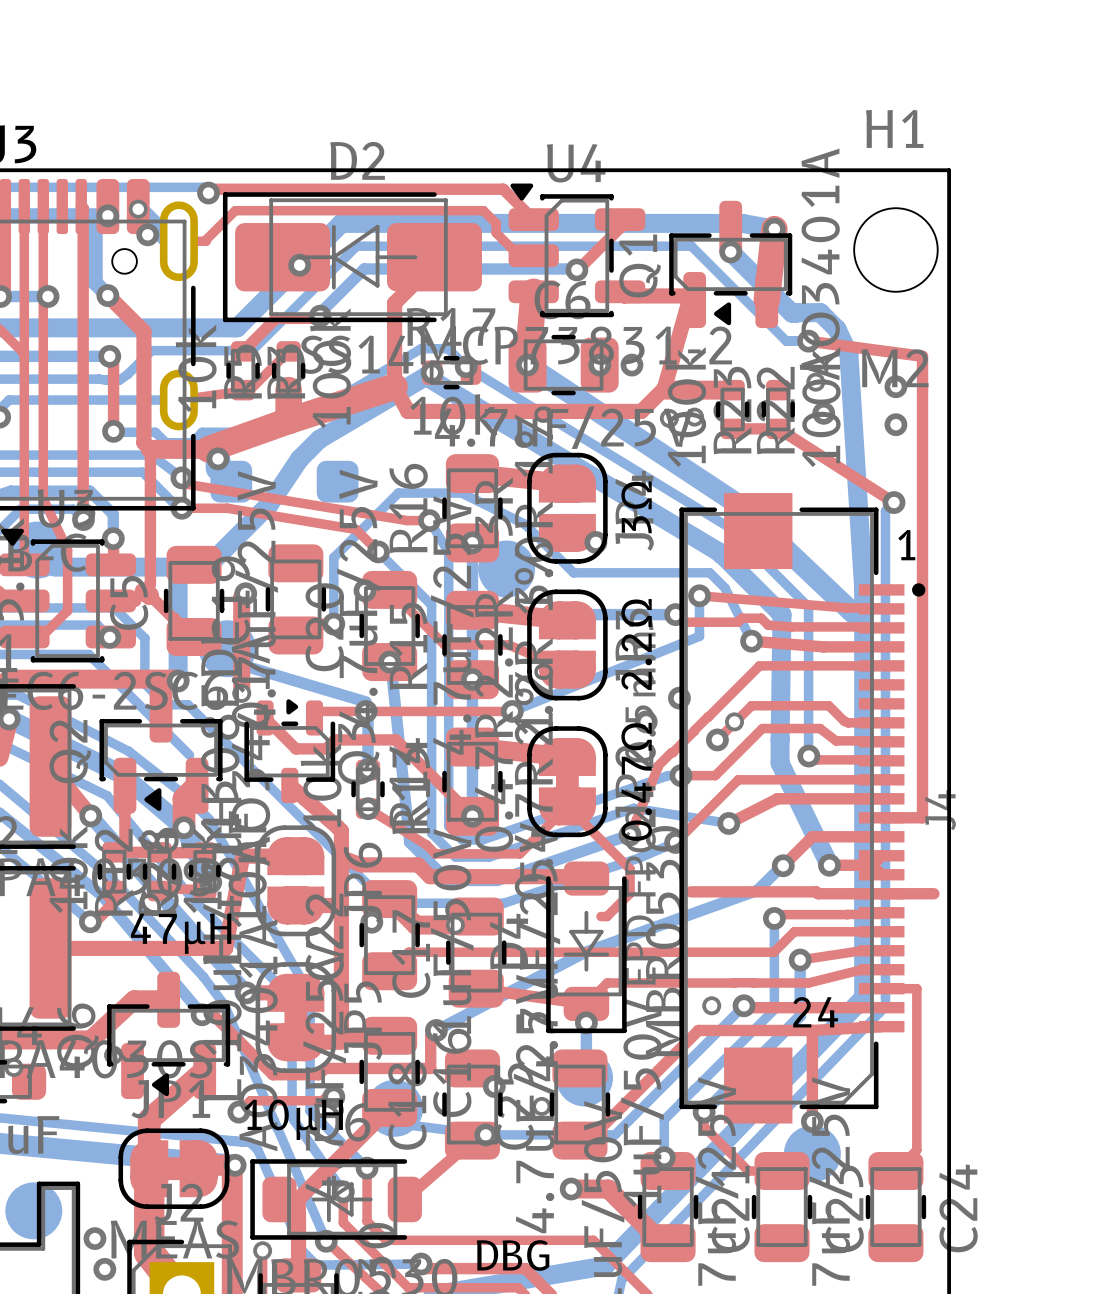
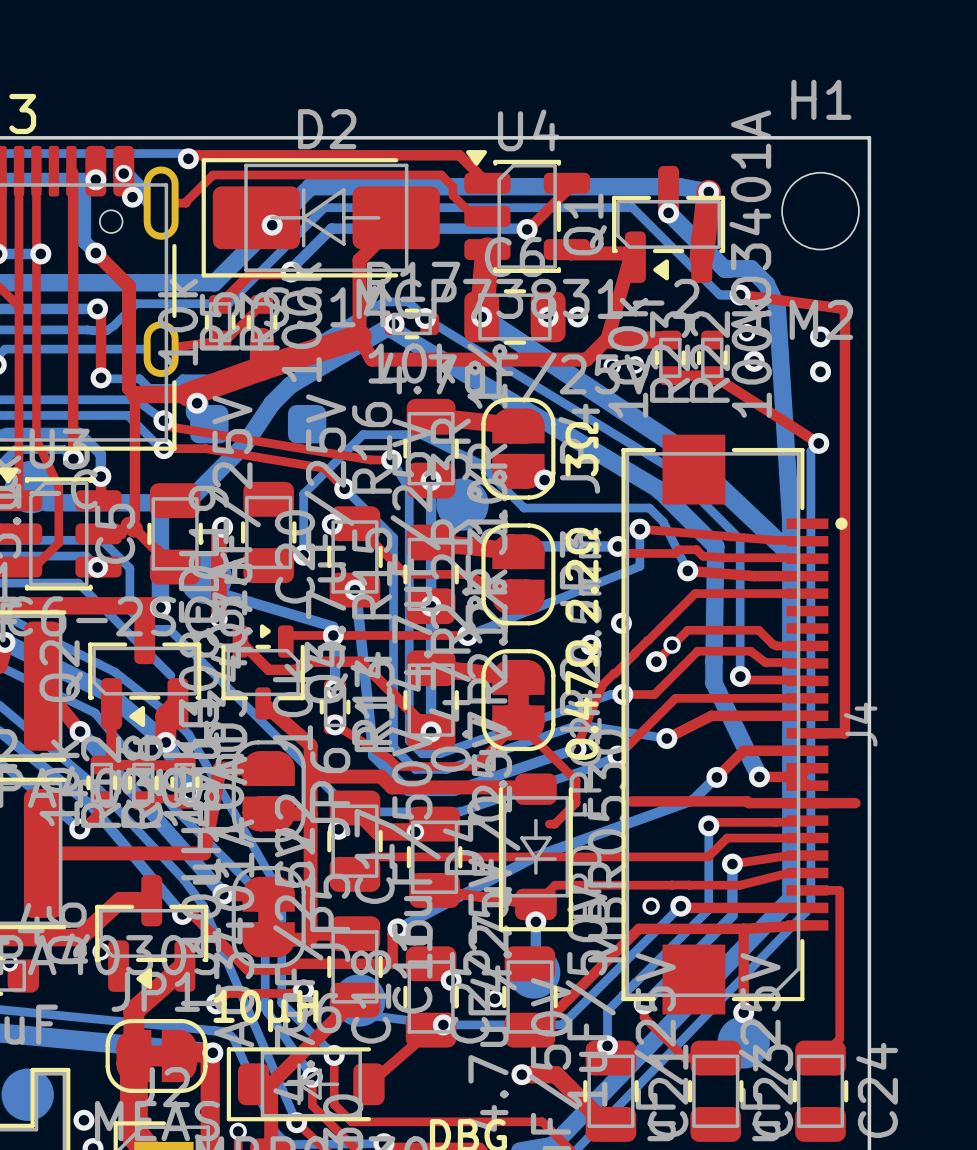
text: 1 (906, 545) -> none
text: 47µH (181, 933) -> none
text: 24 (815, 1012) -> none

